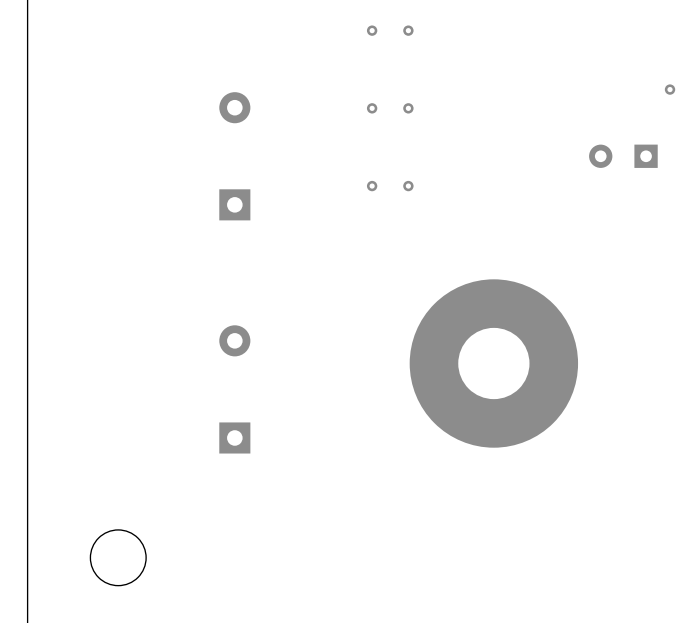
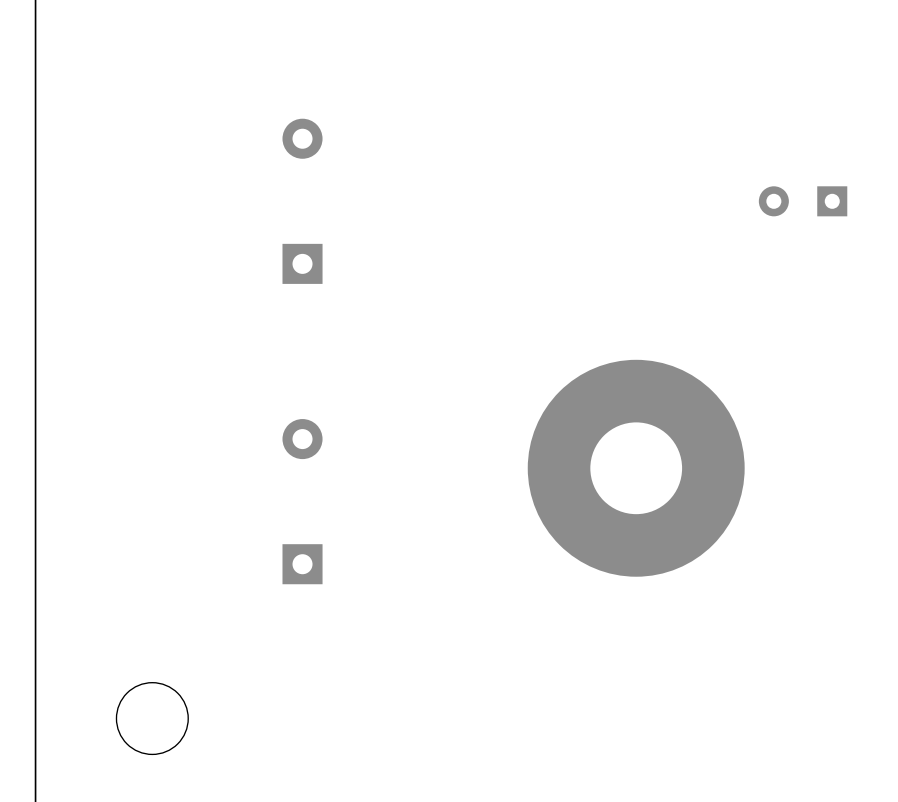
via: (372, 30) -> none
via: (408, 30) -> none
via: (670, 89) -> none
via: (372, 108) -> none
via: (408, 108) -> none
via: (372, 186) -> none
via: (408, 186) -> none

